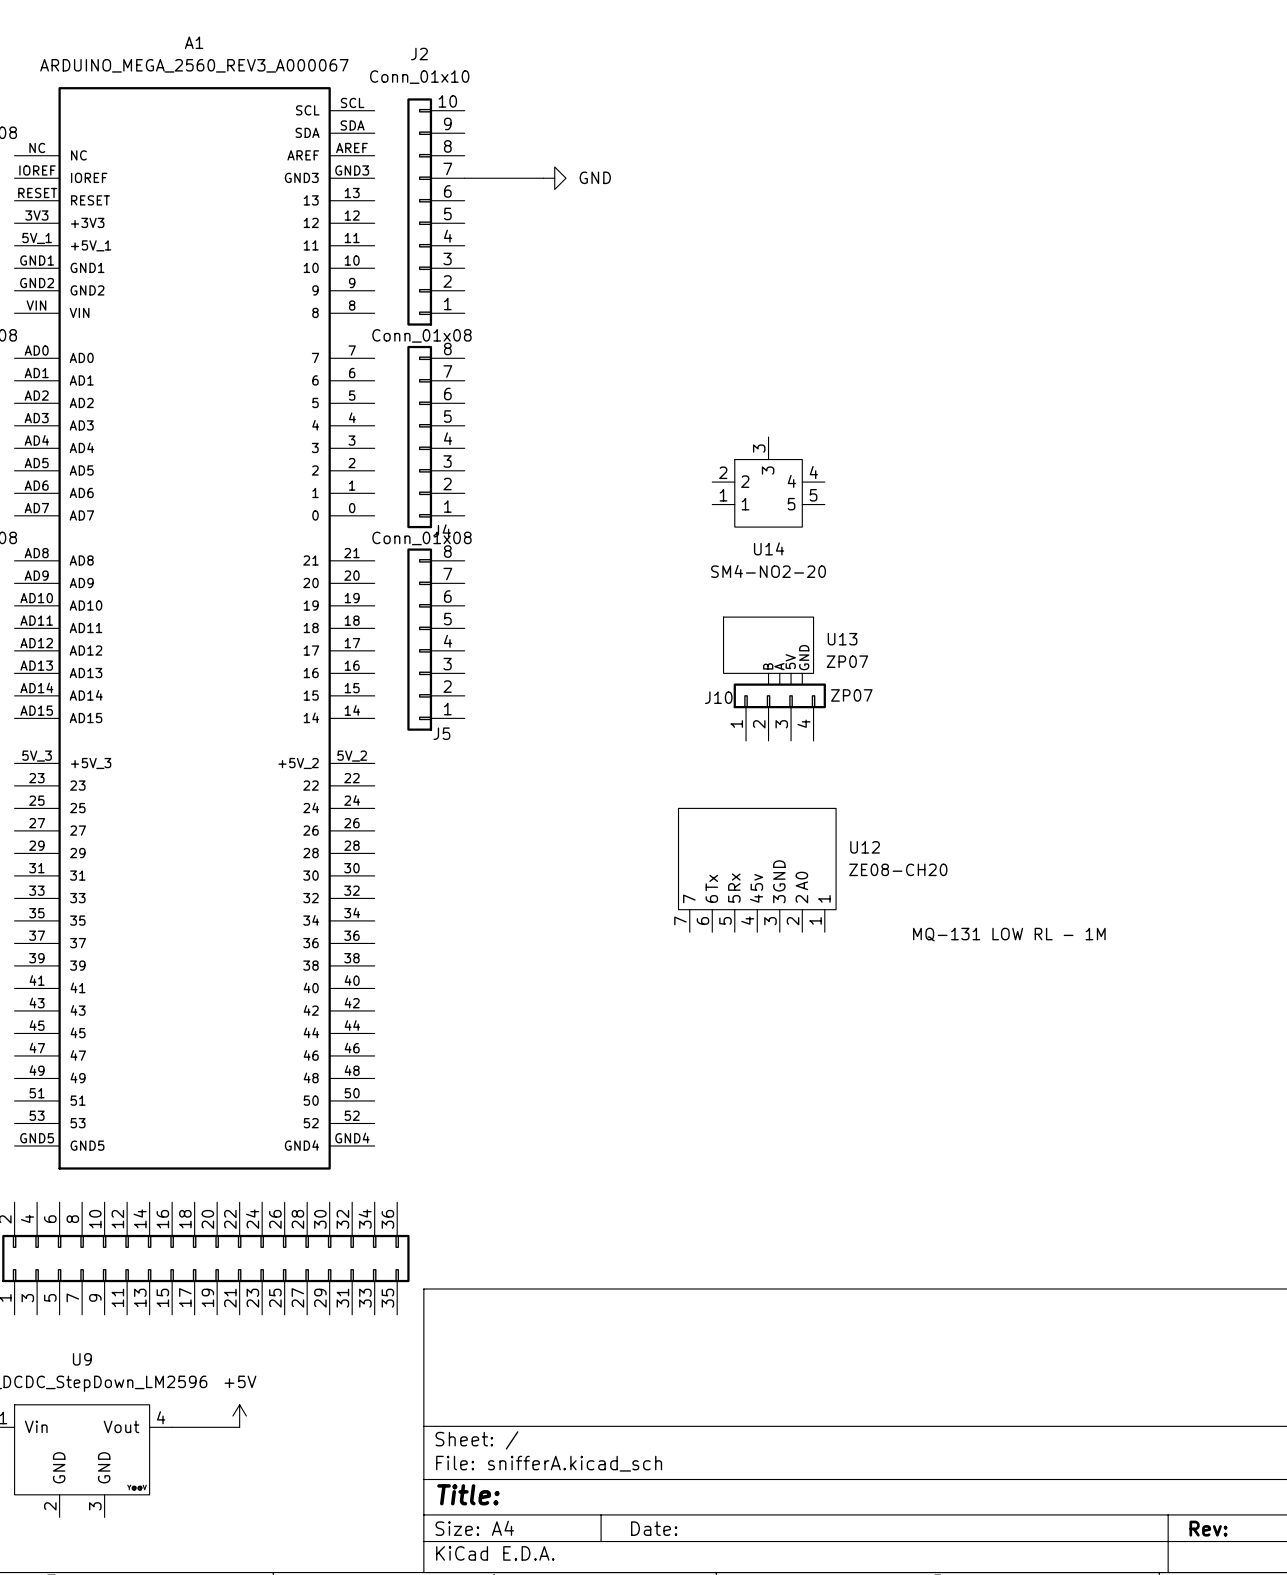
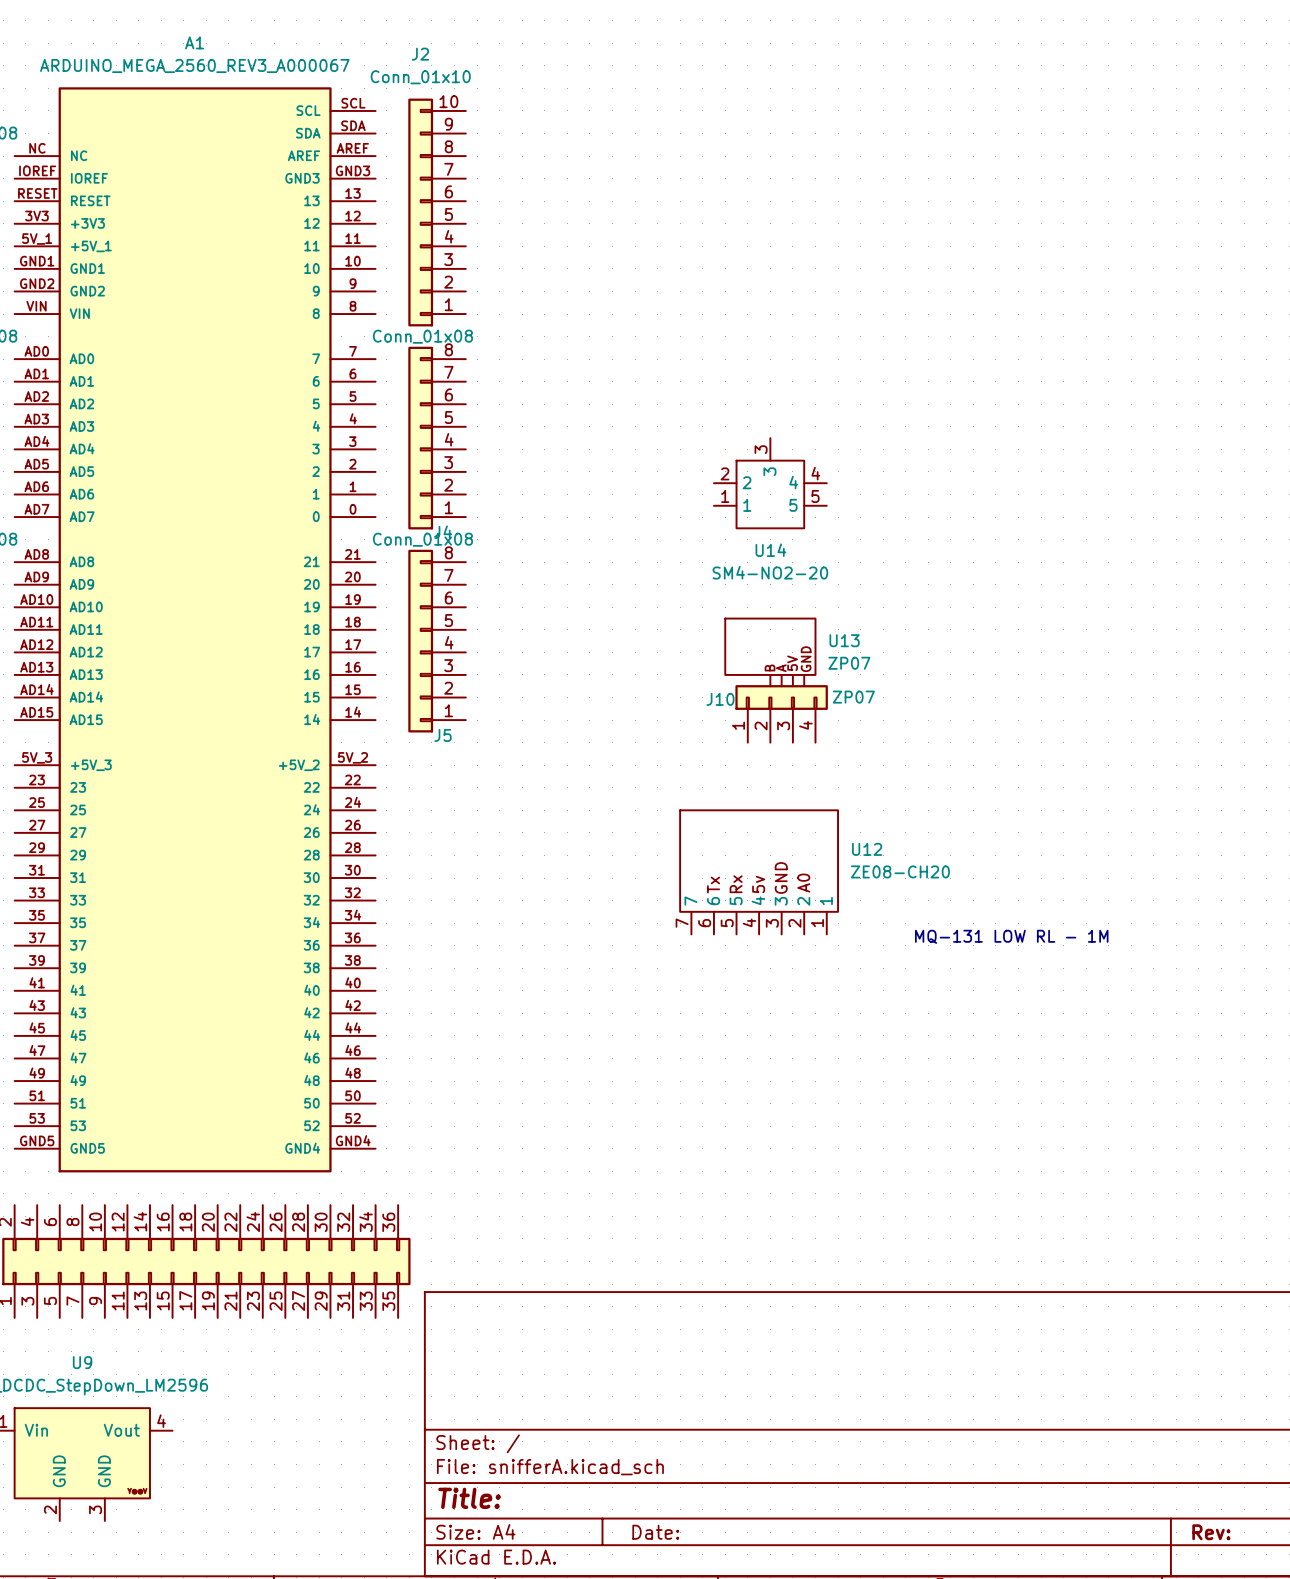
wire: (464, 178) (543, 178) -> none
power symbol: GND (554, 178) -> none
power symbol: +5V (239, 1416) -> none
wire: (172, 1427) (239, 1427) -> none

